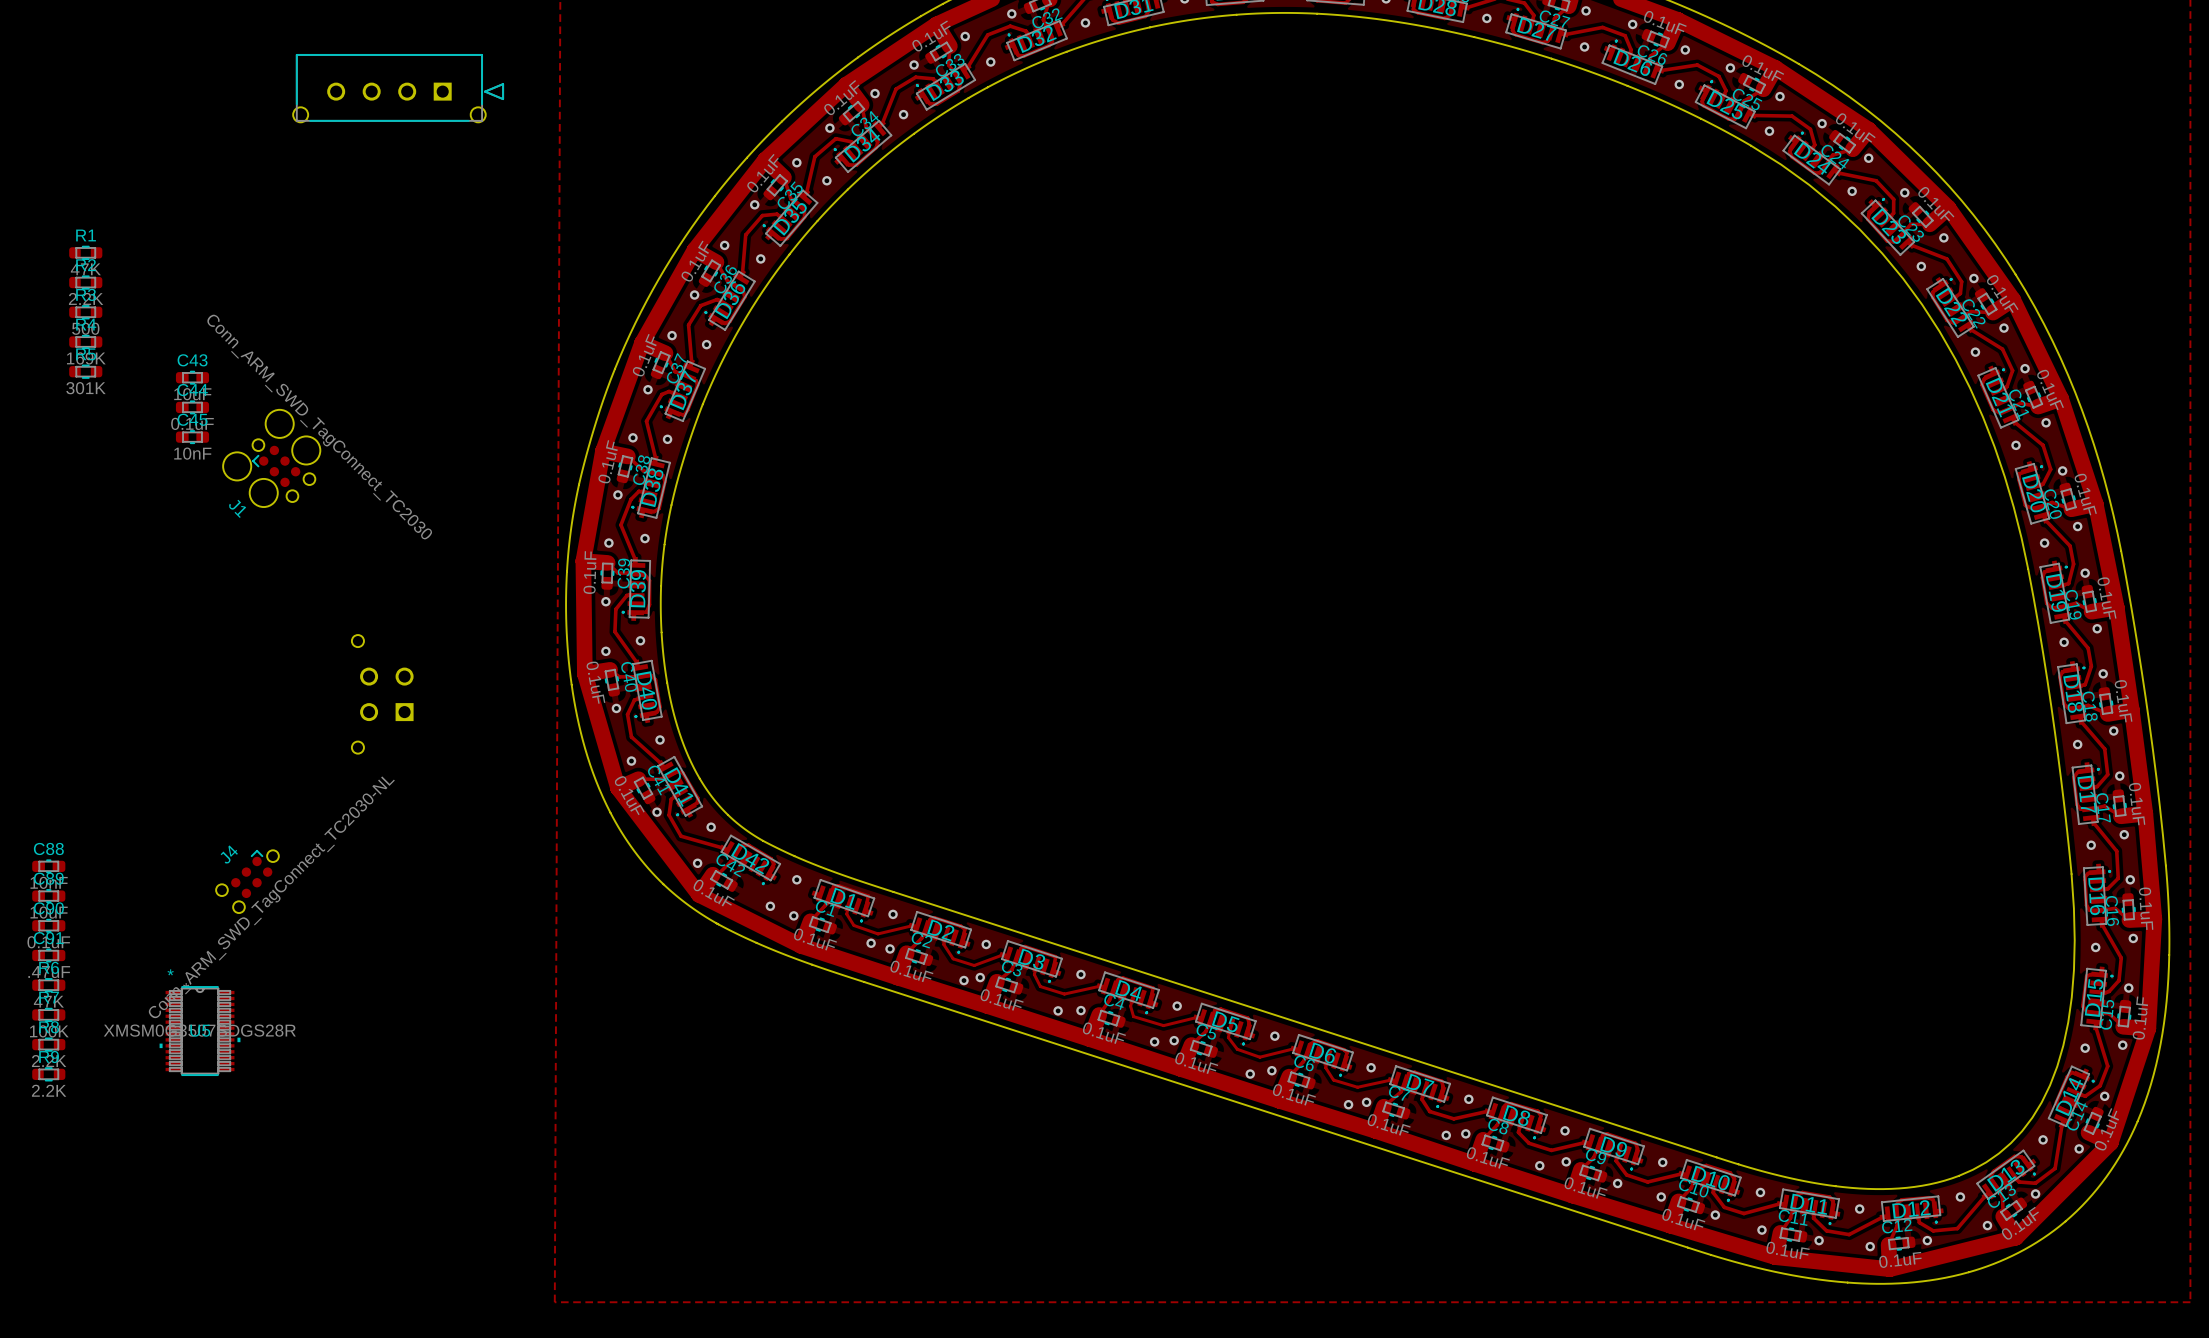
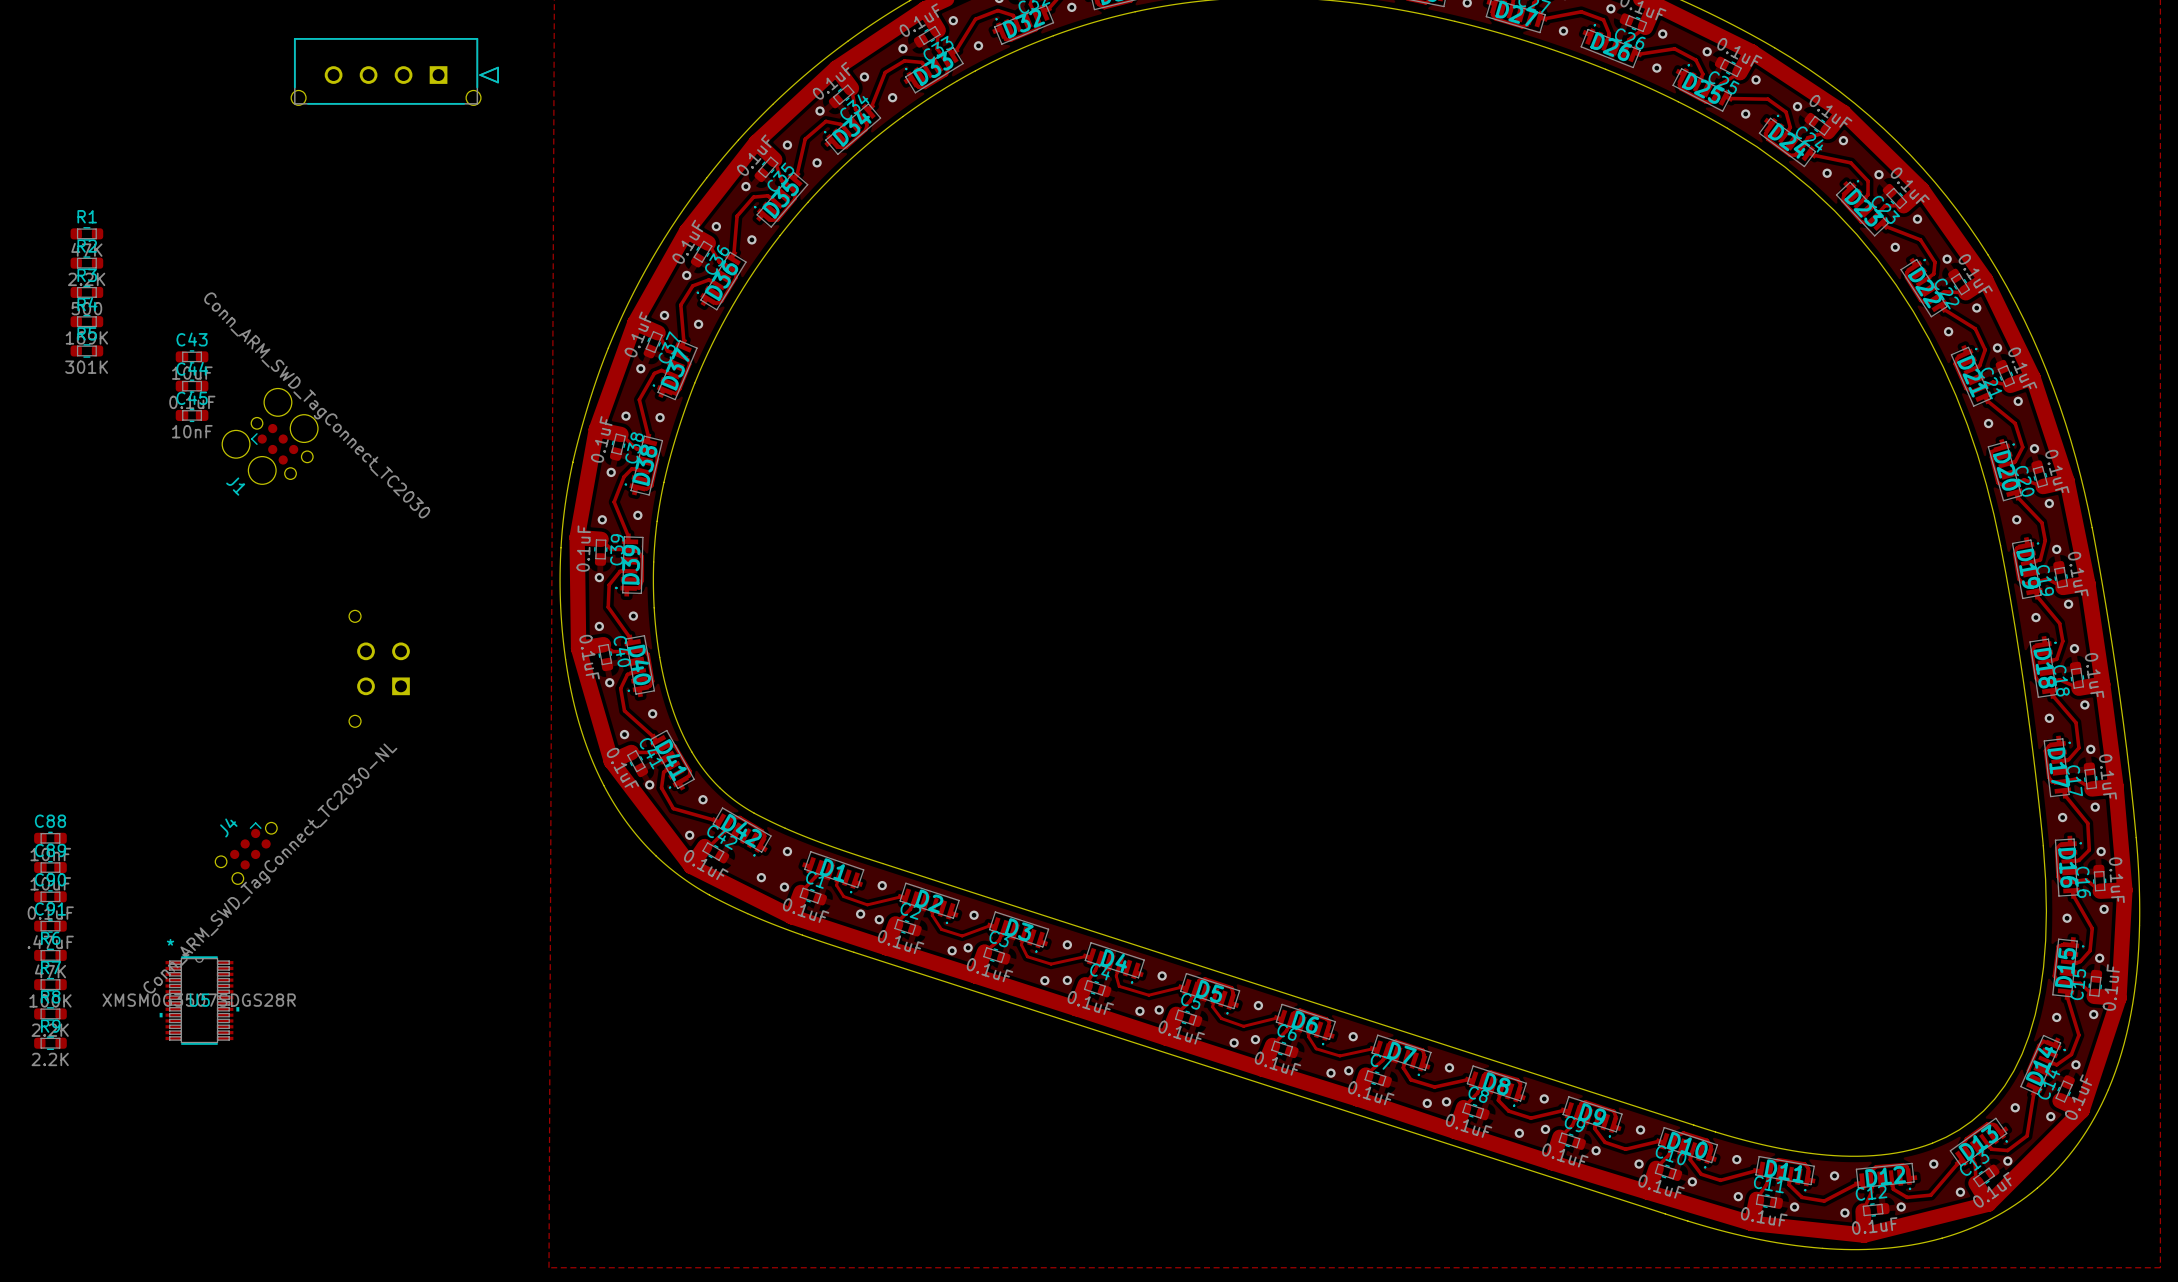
track: (829, 896) (833, 886) (838, 885) (868, 896) (865, 909) -> none
track: (925, 928) (930, 919) (934, 917) (960, 926) (964, 929) (962, 940) -> none
track: (1016, 957) (1021, 948) (1025, 946) (1055, 956) (1053, 969) -> none
track: (1113, 988) (1117, 980) (1123, 978) (1153, 988) (1150, 1000) -> none

